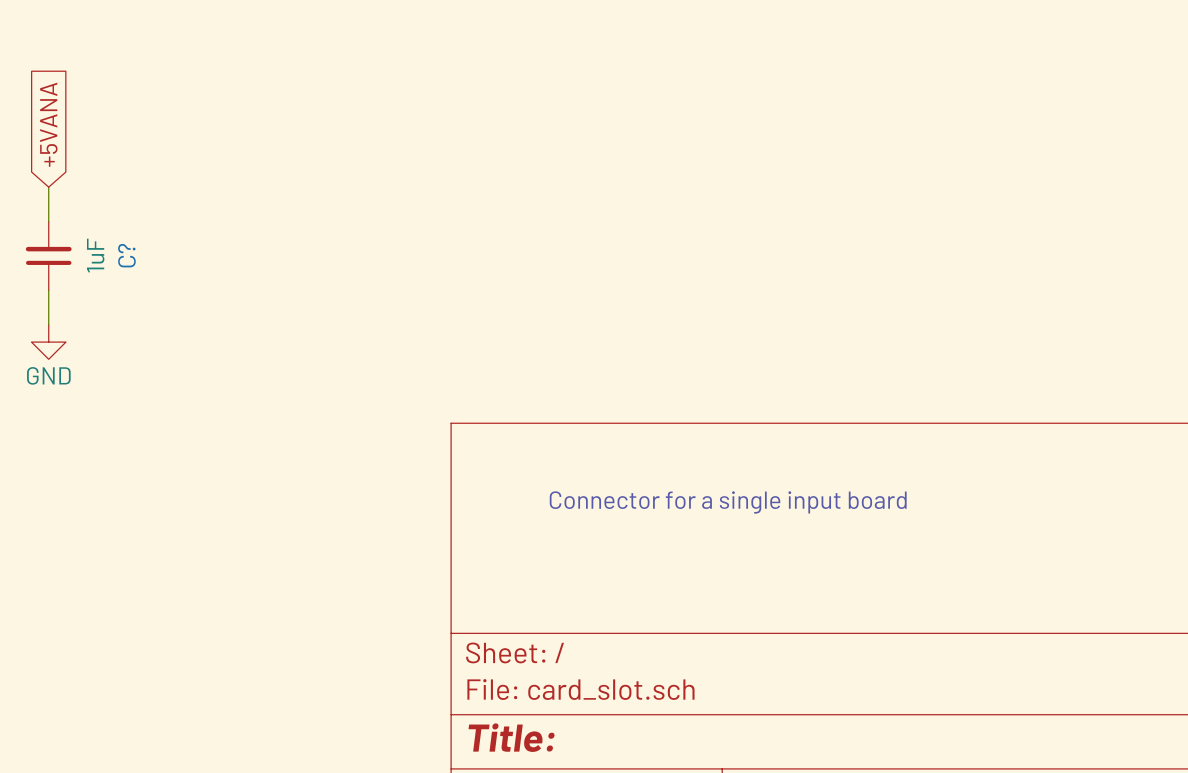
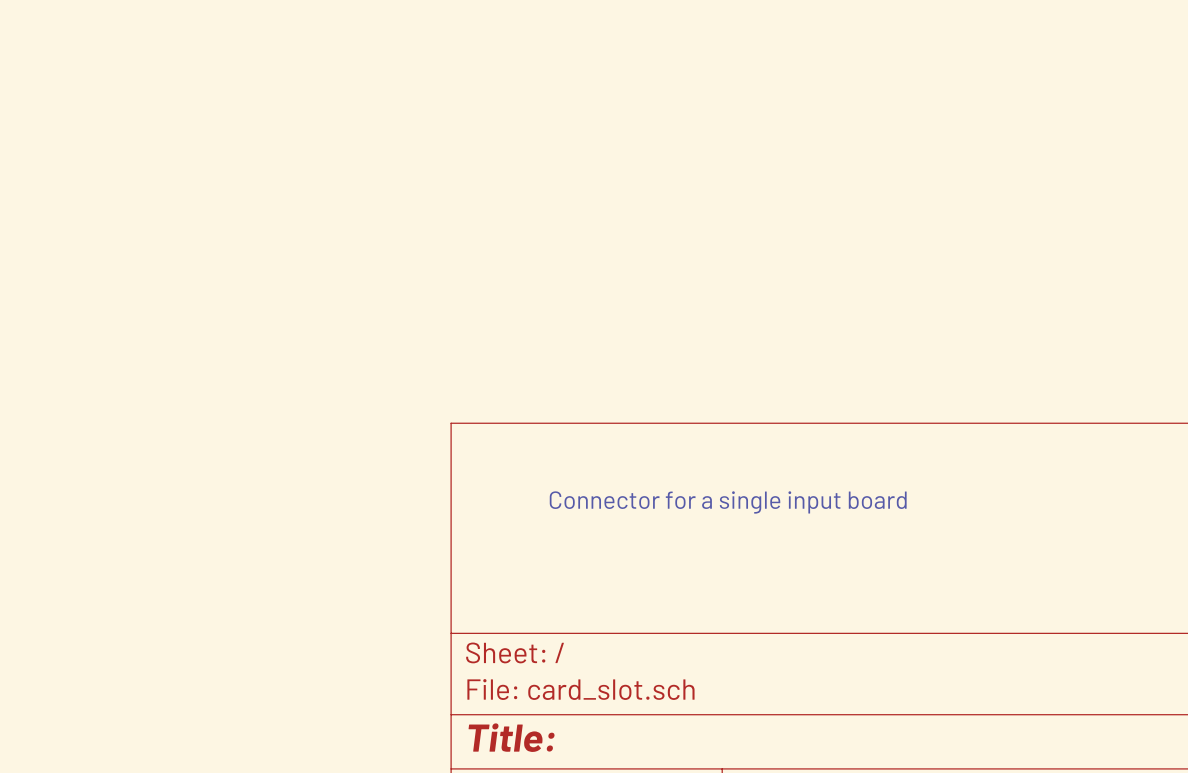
global label: +5VANA (48, 124) -> none
wire: (48, 187) (48, 221) -> none
C?: 1uF (48, 256) -> none
wire: (48, 290) (48, 324) -> none
power symbol: GND (48, 342) -> none

